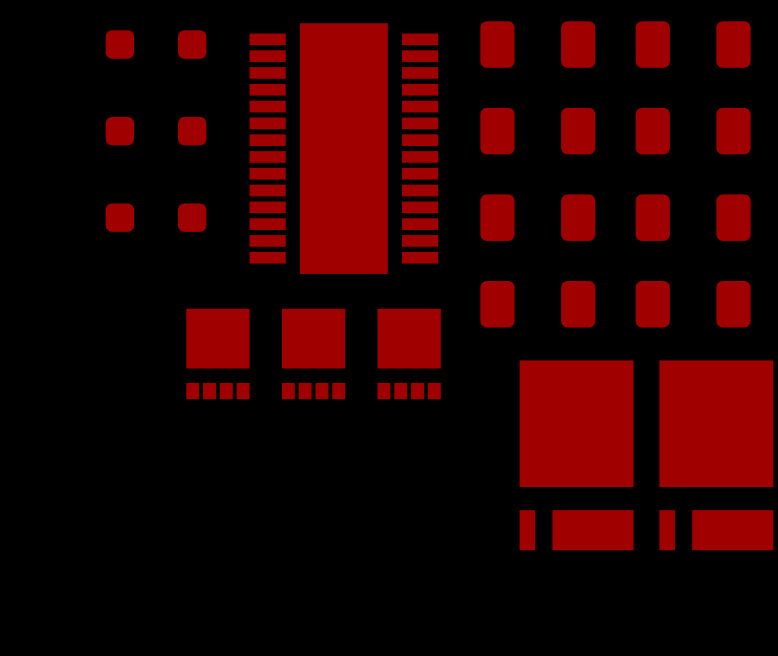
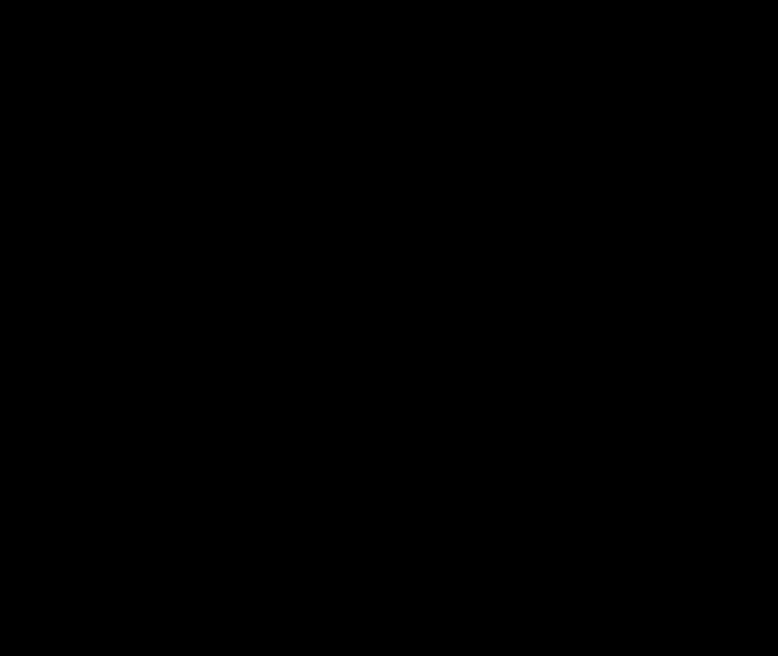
part: (156, 44) -> none
part: (537, 44) -> none
part: (693, 44) -> none
part: (156, 131) -> none
part: (537, 131) -> none
part: (693, 131) -> none
part: (343, 148) -> none
part: (156, 217) -> none
part: (537, 217) -> none
part: (693, 217) -> none
part: (537, 304) -> none
part: (693, 304) -> none
part: (217, 353) -> none
part: (313, 353) -> none
part: (409, 353) -> none
part: (576, 455) -> none
part: (716, 455) -> none

